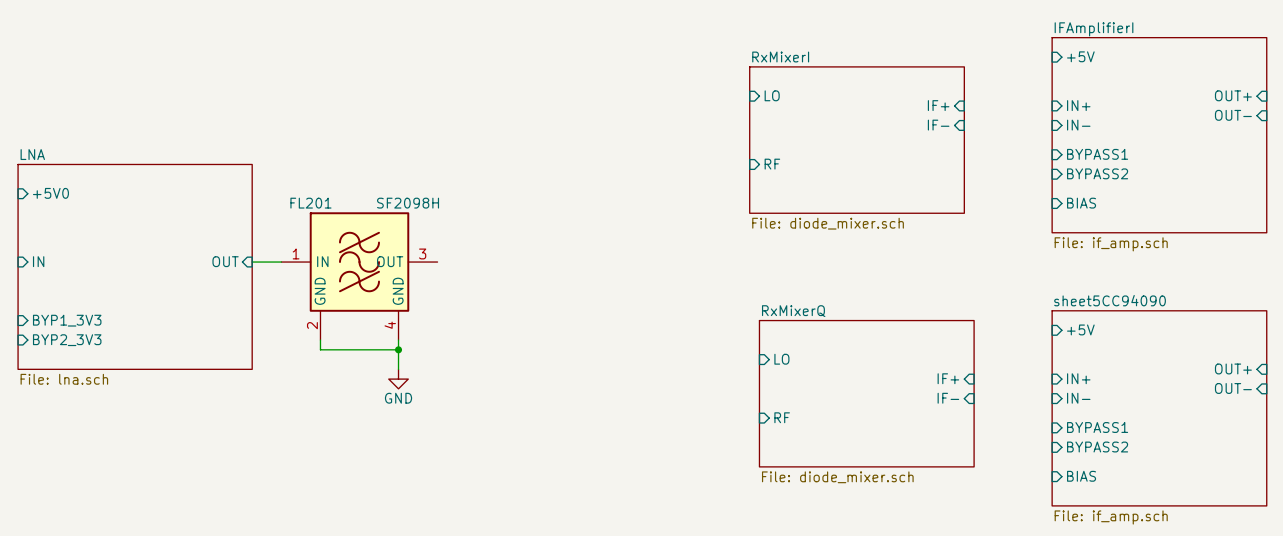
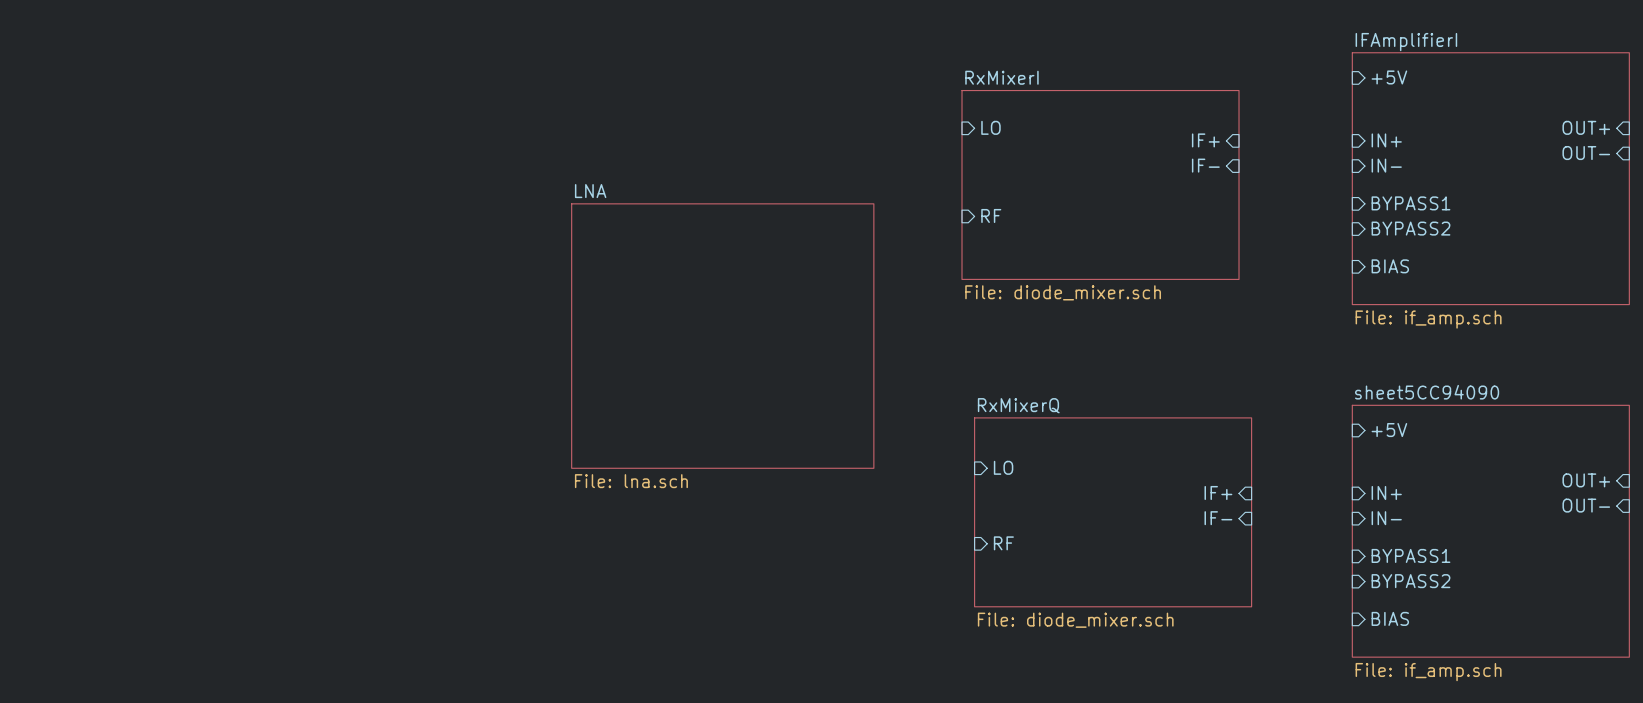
sheet pin: +5V0 (50, 193) -> none
sheet LNA: none -> File: lna.sch (722, 336)
sheet pin: IN (38, 261) -> none
sheet pin: OUT (225, 261) -> none
wire: (252, 262) (281, 262) -> none
sheet LNA: File: lna.sch (135, 266) -> none
FL201: SF2098H (359, 276) -> none
sheet pin: BYP1_3V3 (67, 320) -> none
sheet pin: BYP2_3V3 (67, 340) -> none
wire: (320, 340) (320, 349) (398, 349) -> none
wire: (398, 340) (398, 369) -> none
junction: (398, 349) -> none
power symbol: GND (398, 379) -> none

